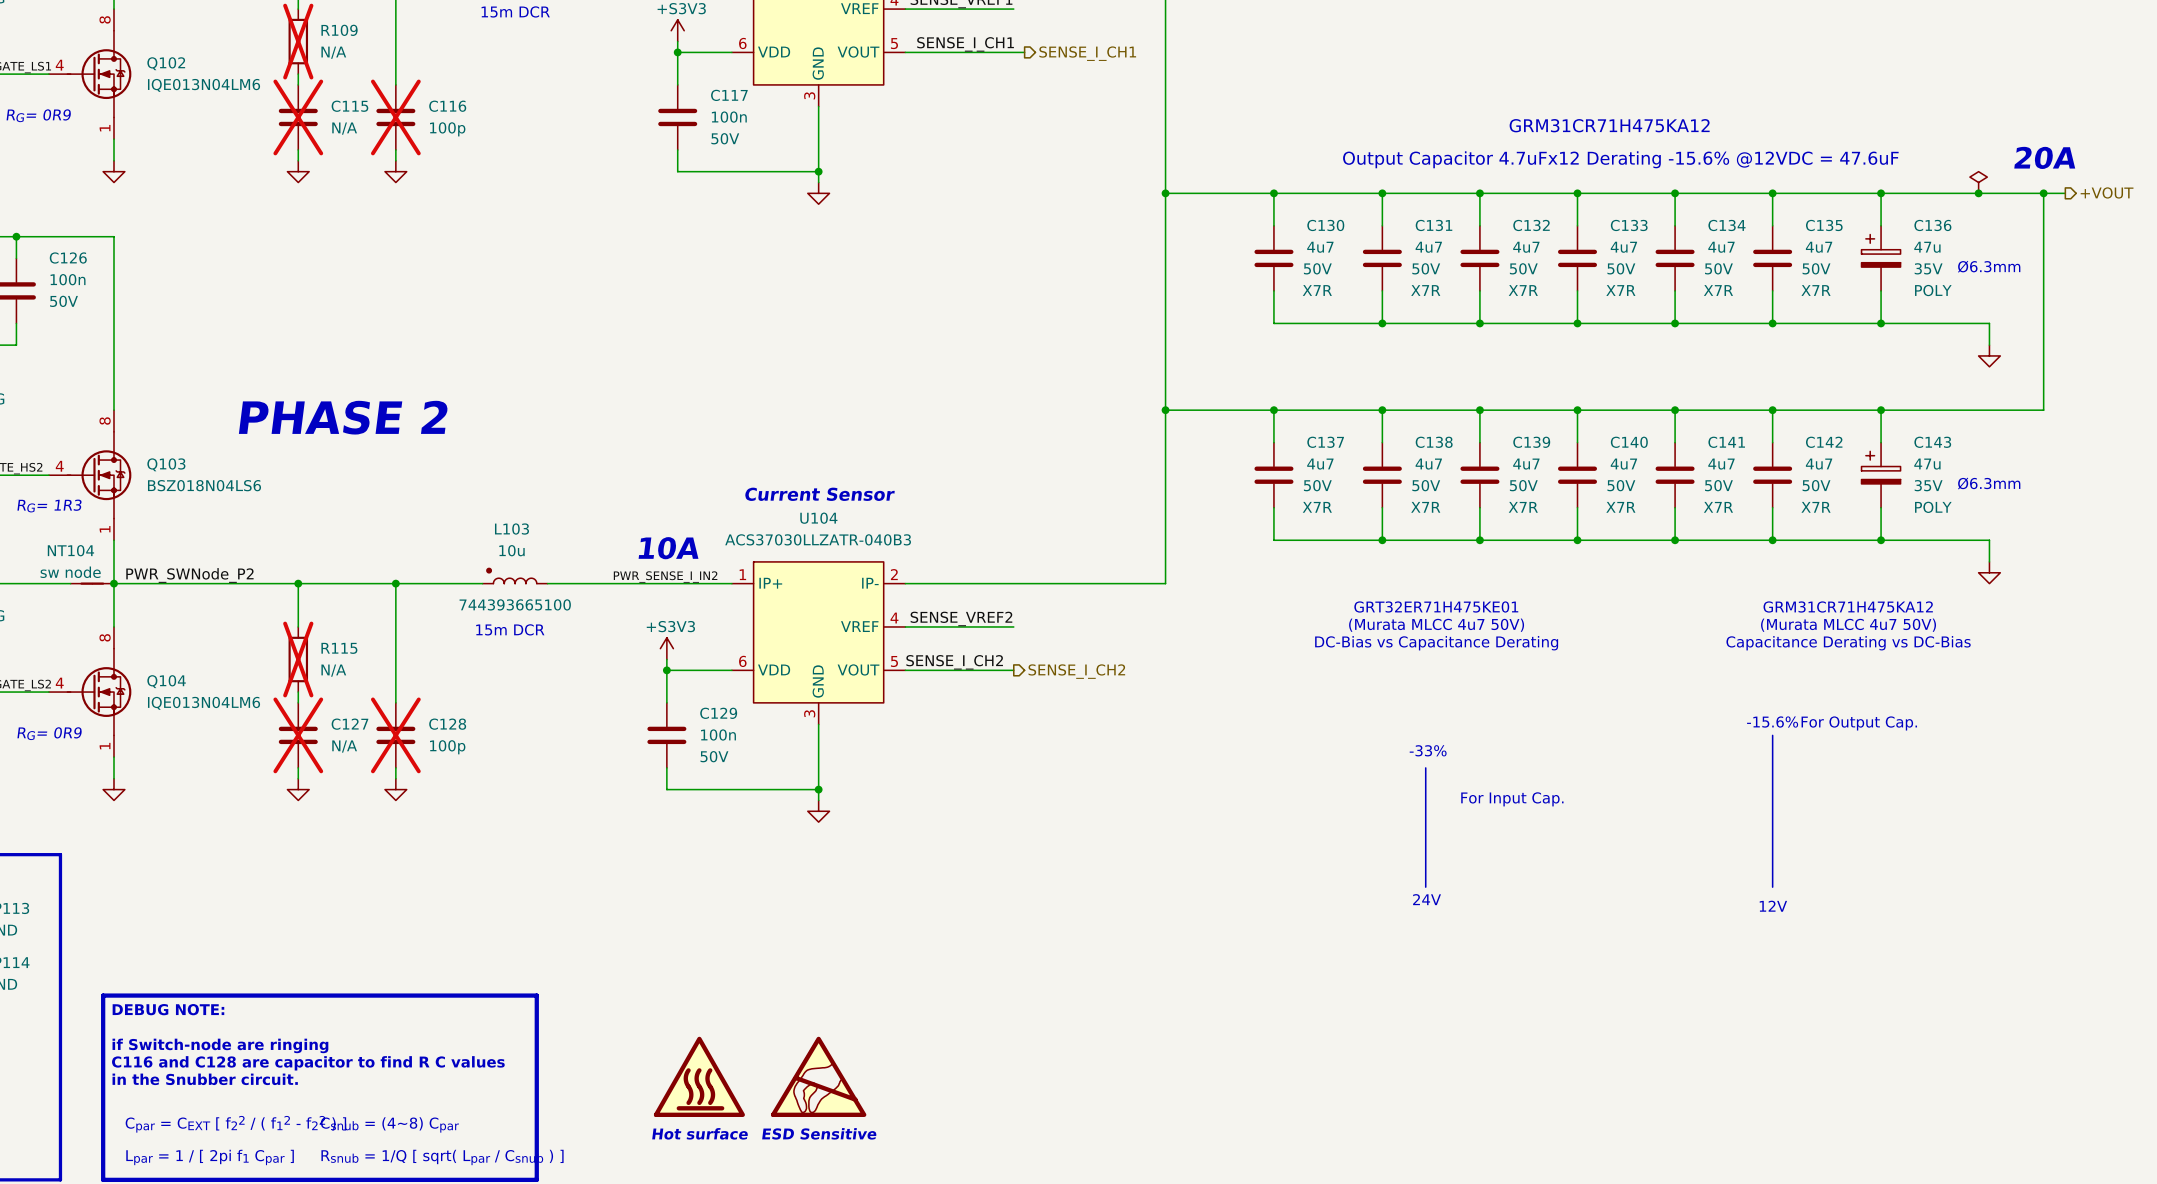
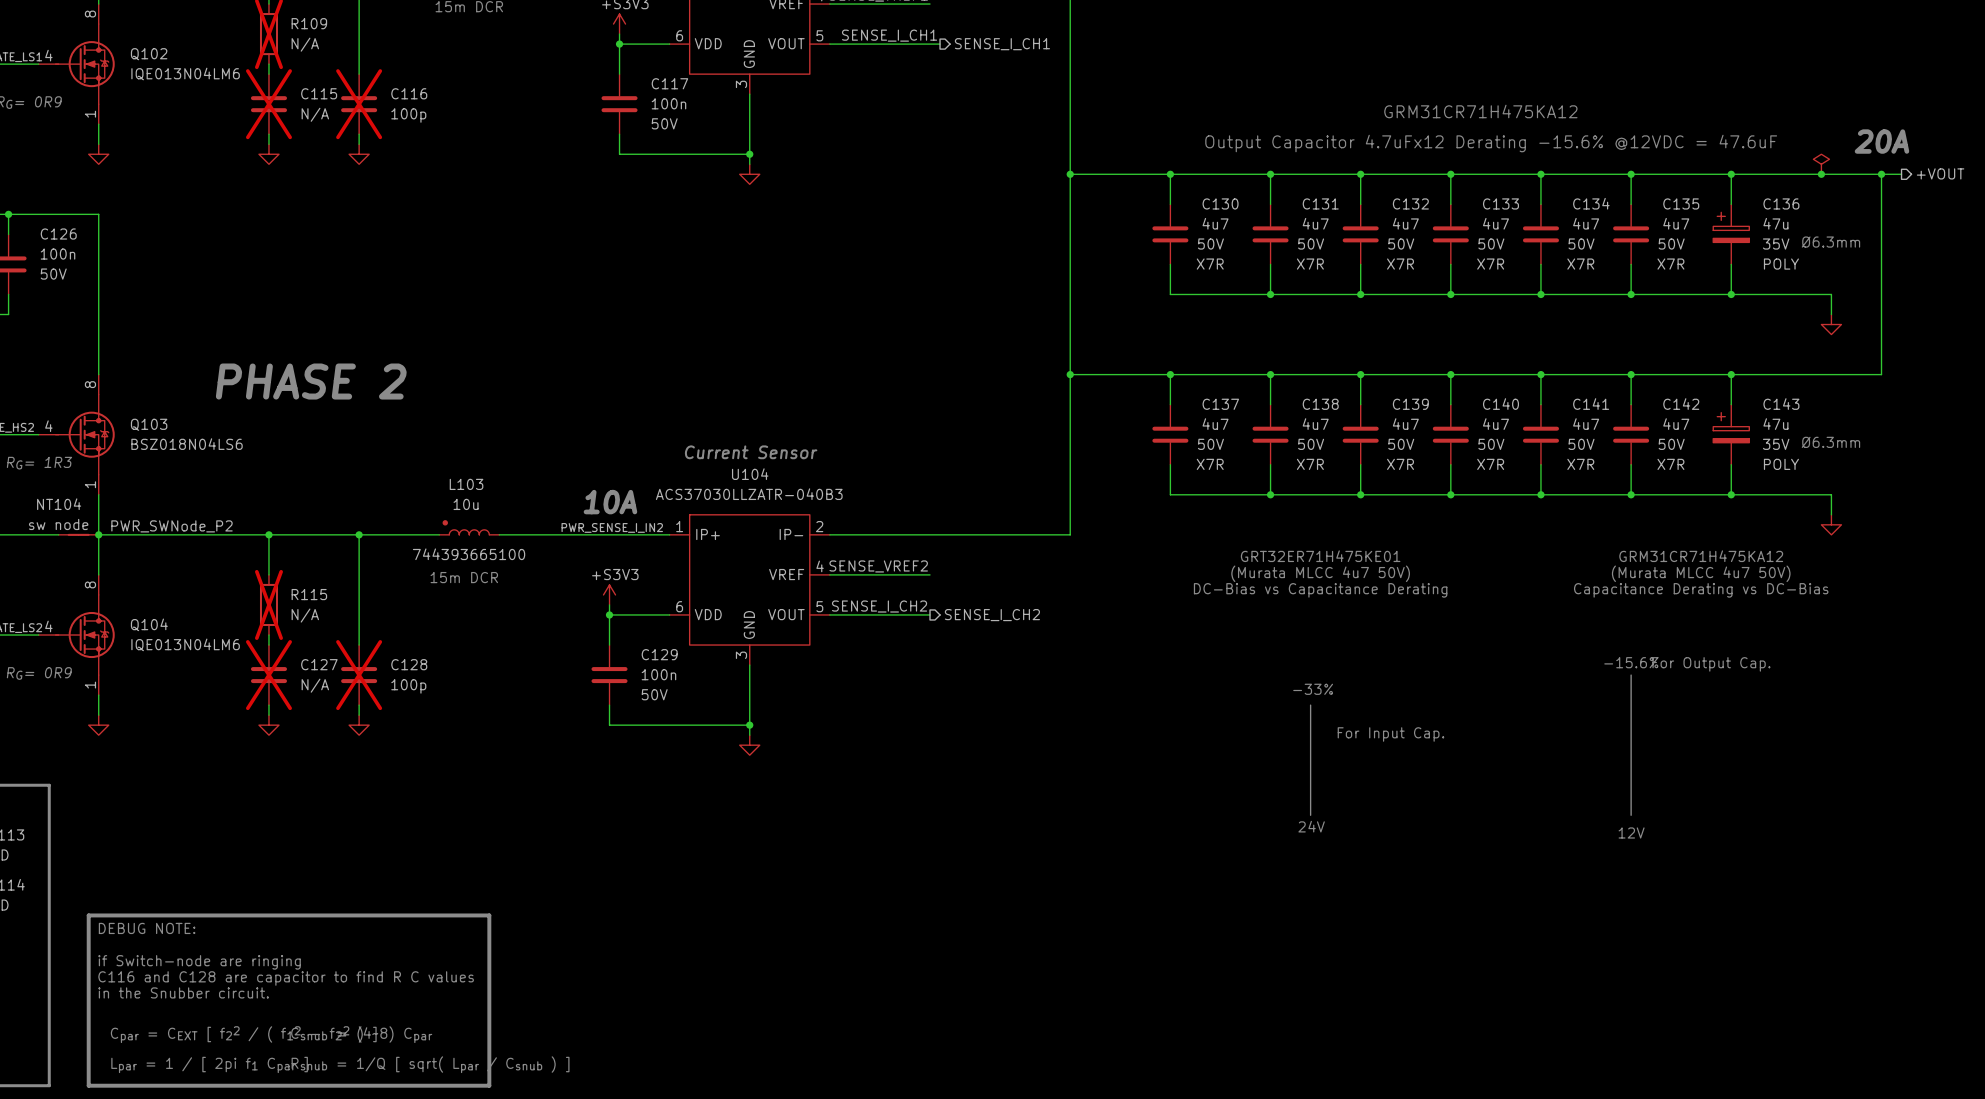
part: (699, 1076) -> none
part: (818, 1076) -> none
text: Hot surface (700, 1133) -> none
text: ESD Sensitive (819, 1133) -> none

